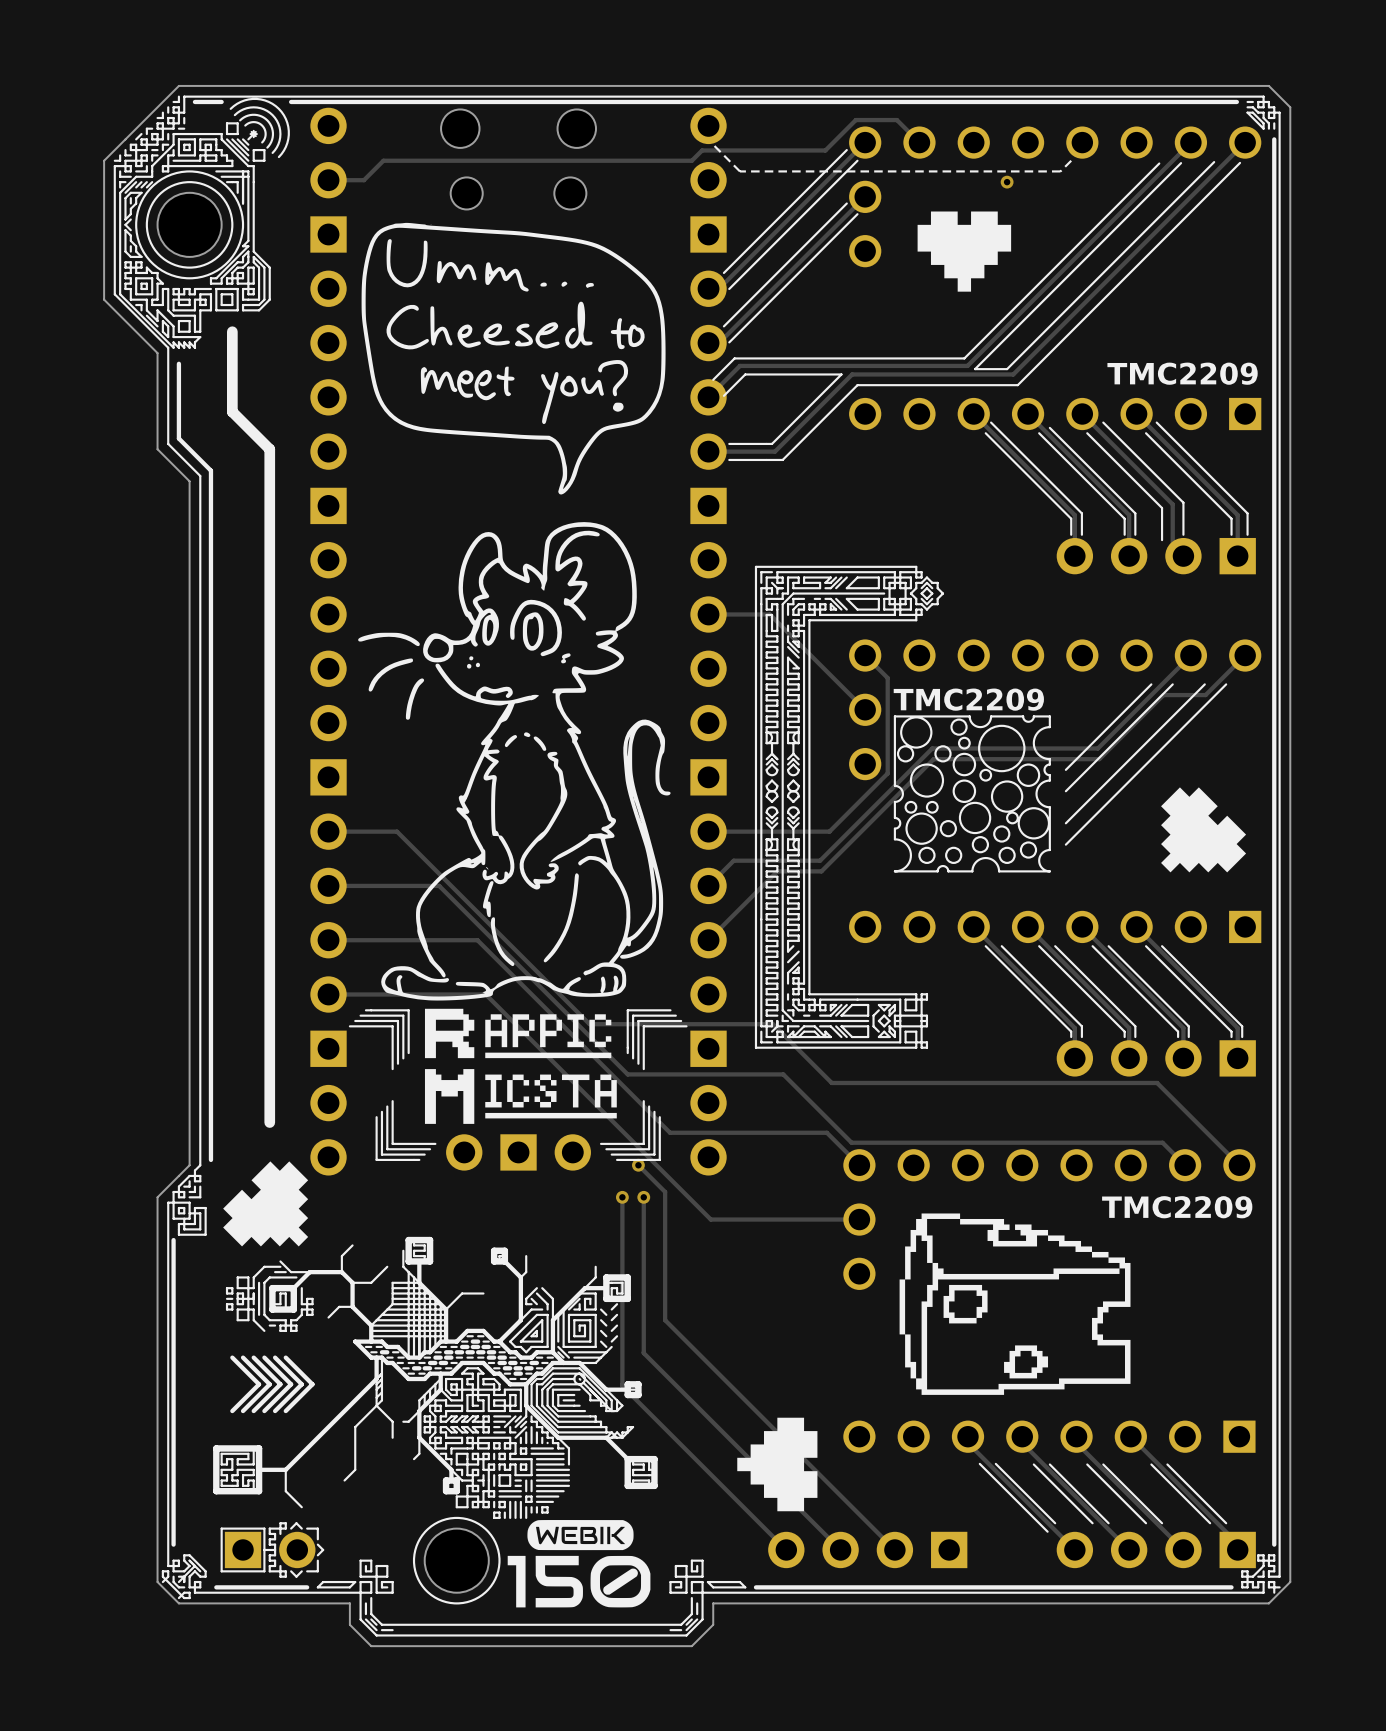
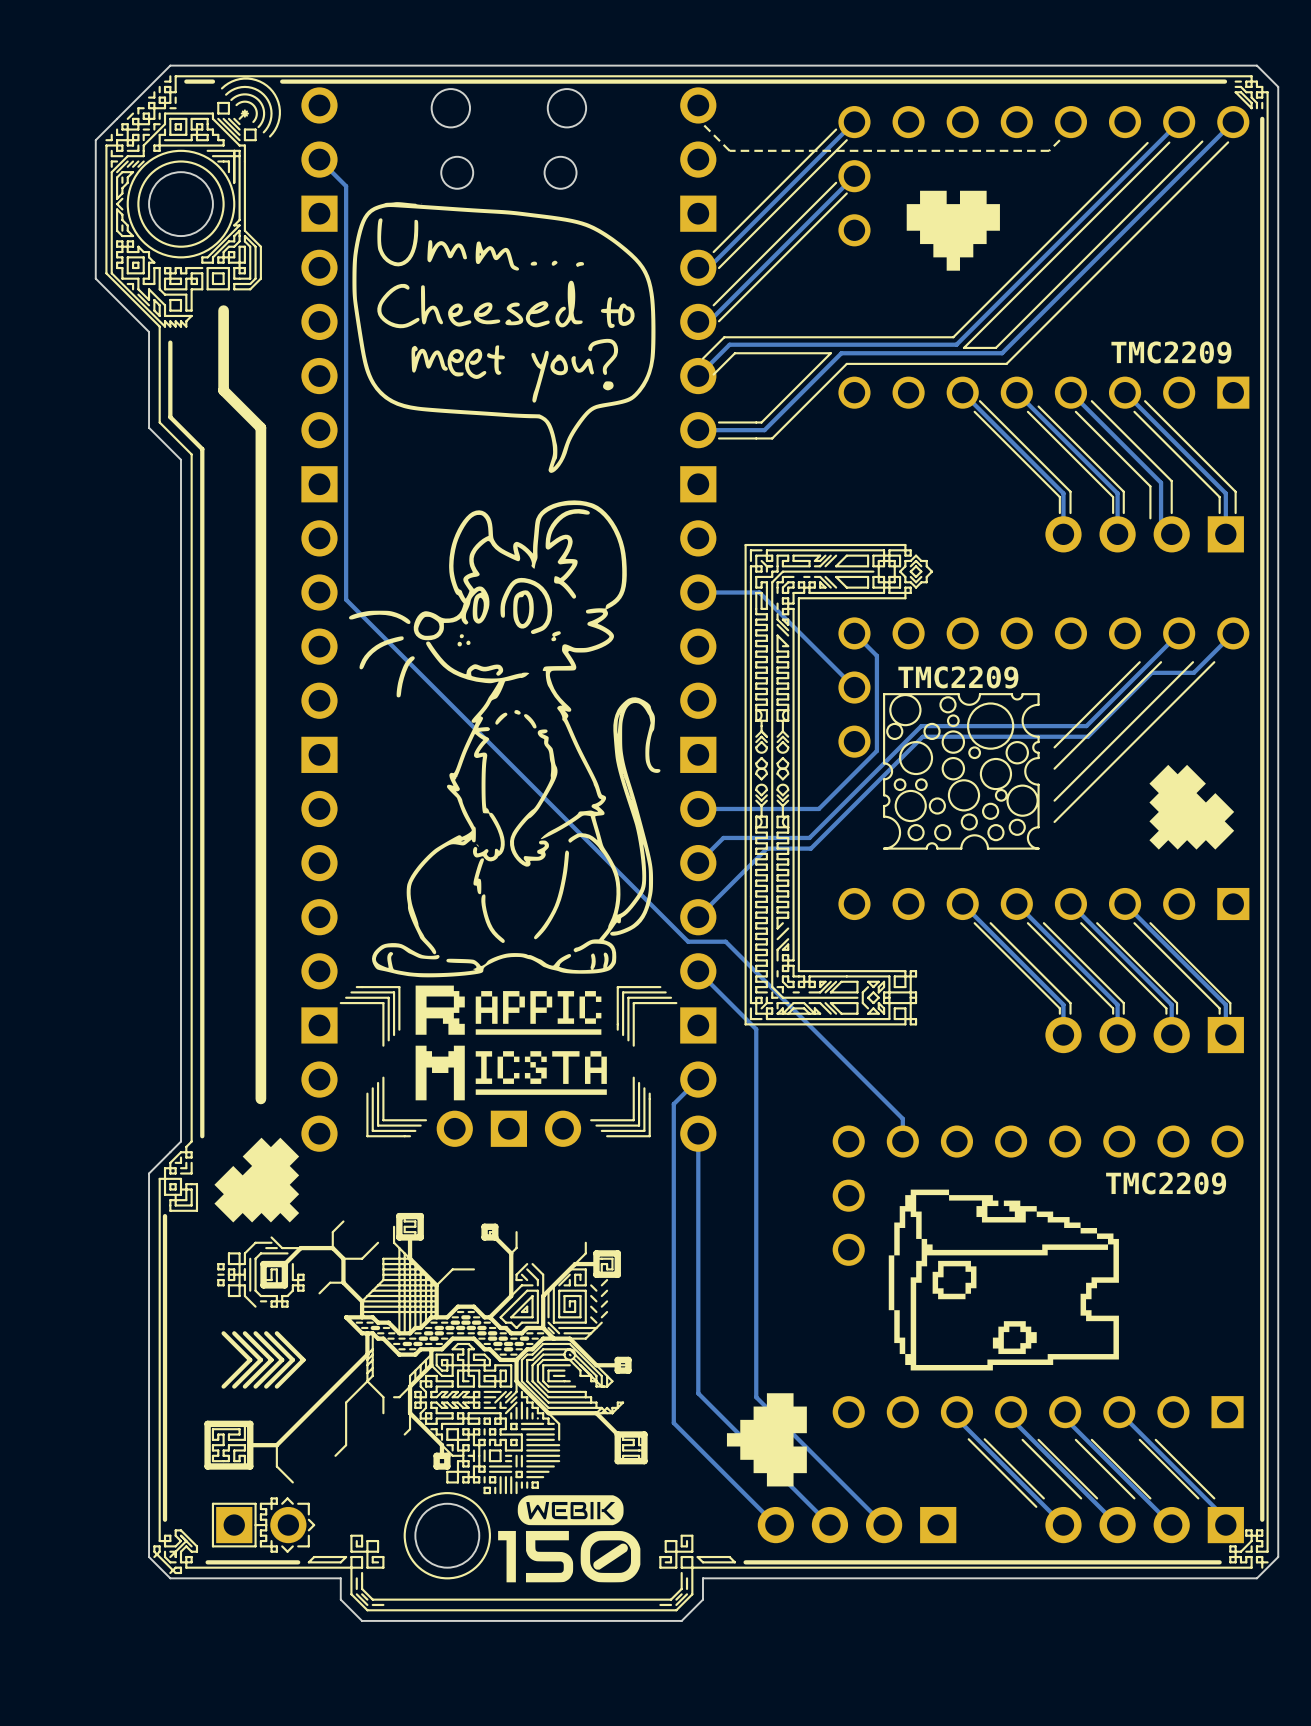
track: (919, 142) (896, 120) (855, 120) (825, 150) (702, 150) (691, 160) (383, 160) (364, 180) (328, 180) -> (902, 1141) (902, 1118) (725, 941) (688, 941) (346, 599) (346, 186) (319, 159)
via: (1007, 182) -> none
track: (328, 831) (397, 831) (589, 1024) (773, 1024) (831, 1082) (1157, 1082) (1239, 1165) -> none
track: (328, 885) (439, 885) (627, 1074) (783, 1074) (851, 1142) (1162, 1142) (1185, 1165) -> none
track: (328, 940) (477, 940) (670, 1132) (826, 1132) (859, 1165) -> none
track: (328, 994) (485, 994) (710, 1219) (859, 1219) -> none
track: (638, 1165) (665, 1191) (665, 1320) (766, 1421) -> (698, 971) (756, 1029) (756, 1397)
via: (638, 1165) -> none
track: (622, 1197) (622, 1386) (683, 1447) -> (698, 1079) (673, 1104) (673, 1423)
via: (622, 1197) -> none
track: (643, 1197) (643, 1353) (708, 1417) -> (698, 1133) (698, 1393)
via: (643, 1197) -> none

